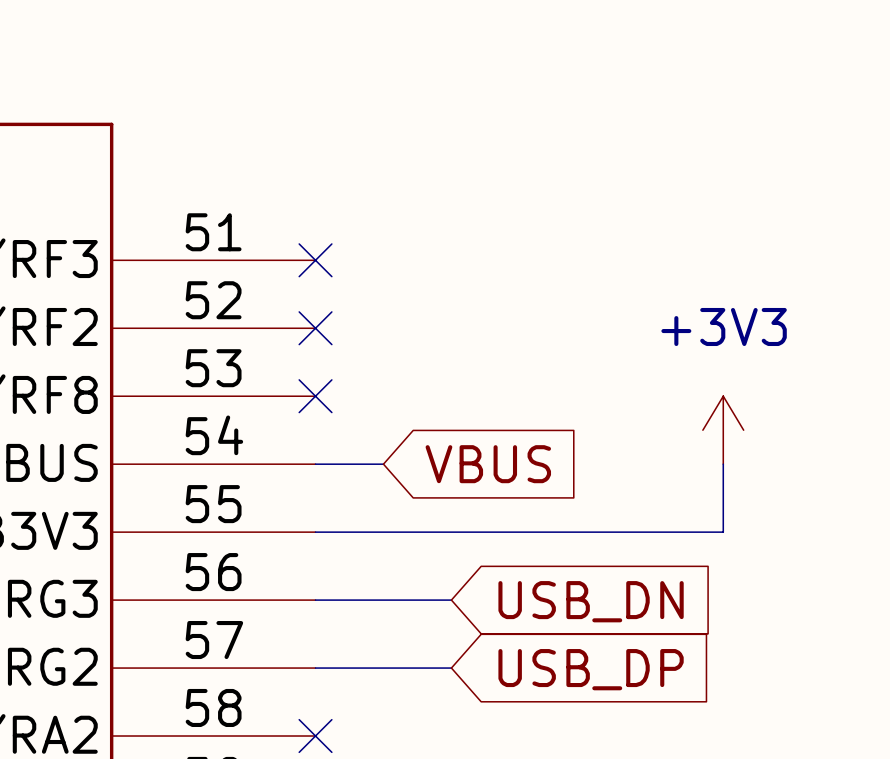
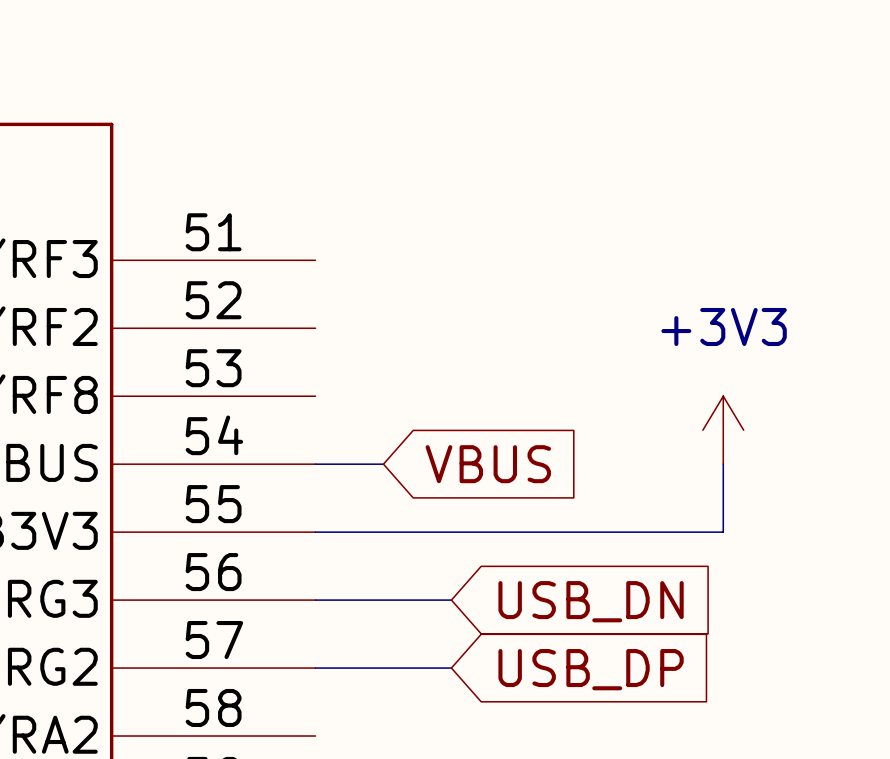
no-connect mark: (315, 260) -> none
no-connect mark: (315, 328) -> none
no-connect mark: (315, 396) -> none
no-connect mark: (315, 736) -> none

